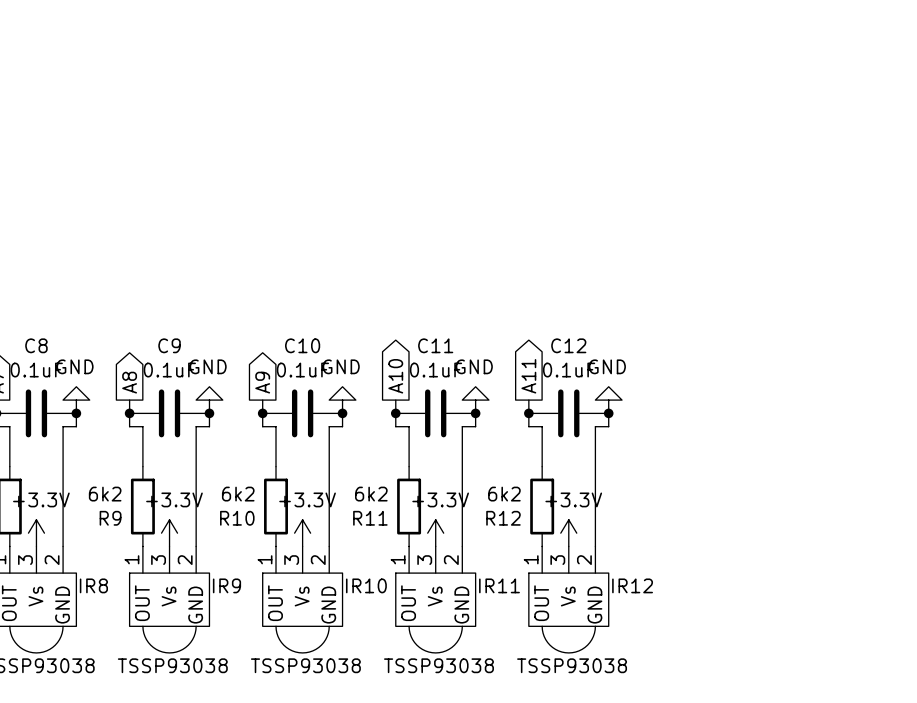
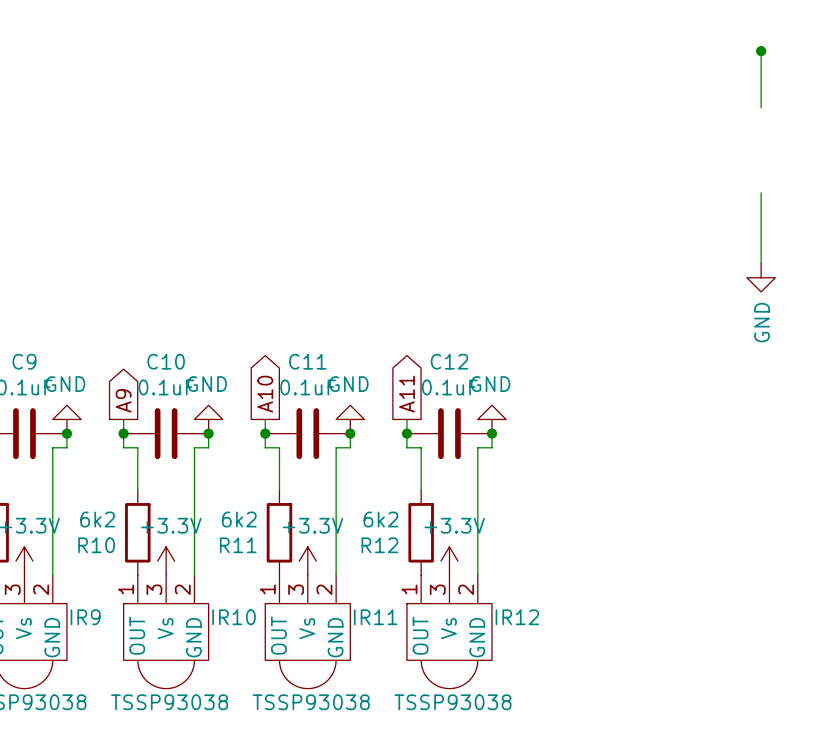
wire: none -> (761, 51) (761, 107)
junction: none -> (761, 51)
wire: none -> (761, 192) (761, 263)
power symbol: none -> GND (761, 277)

